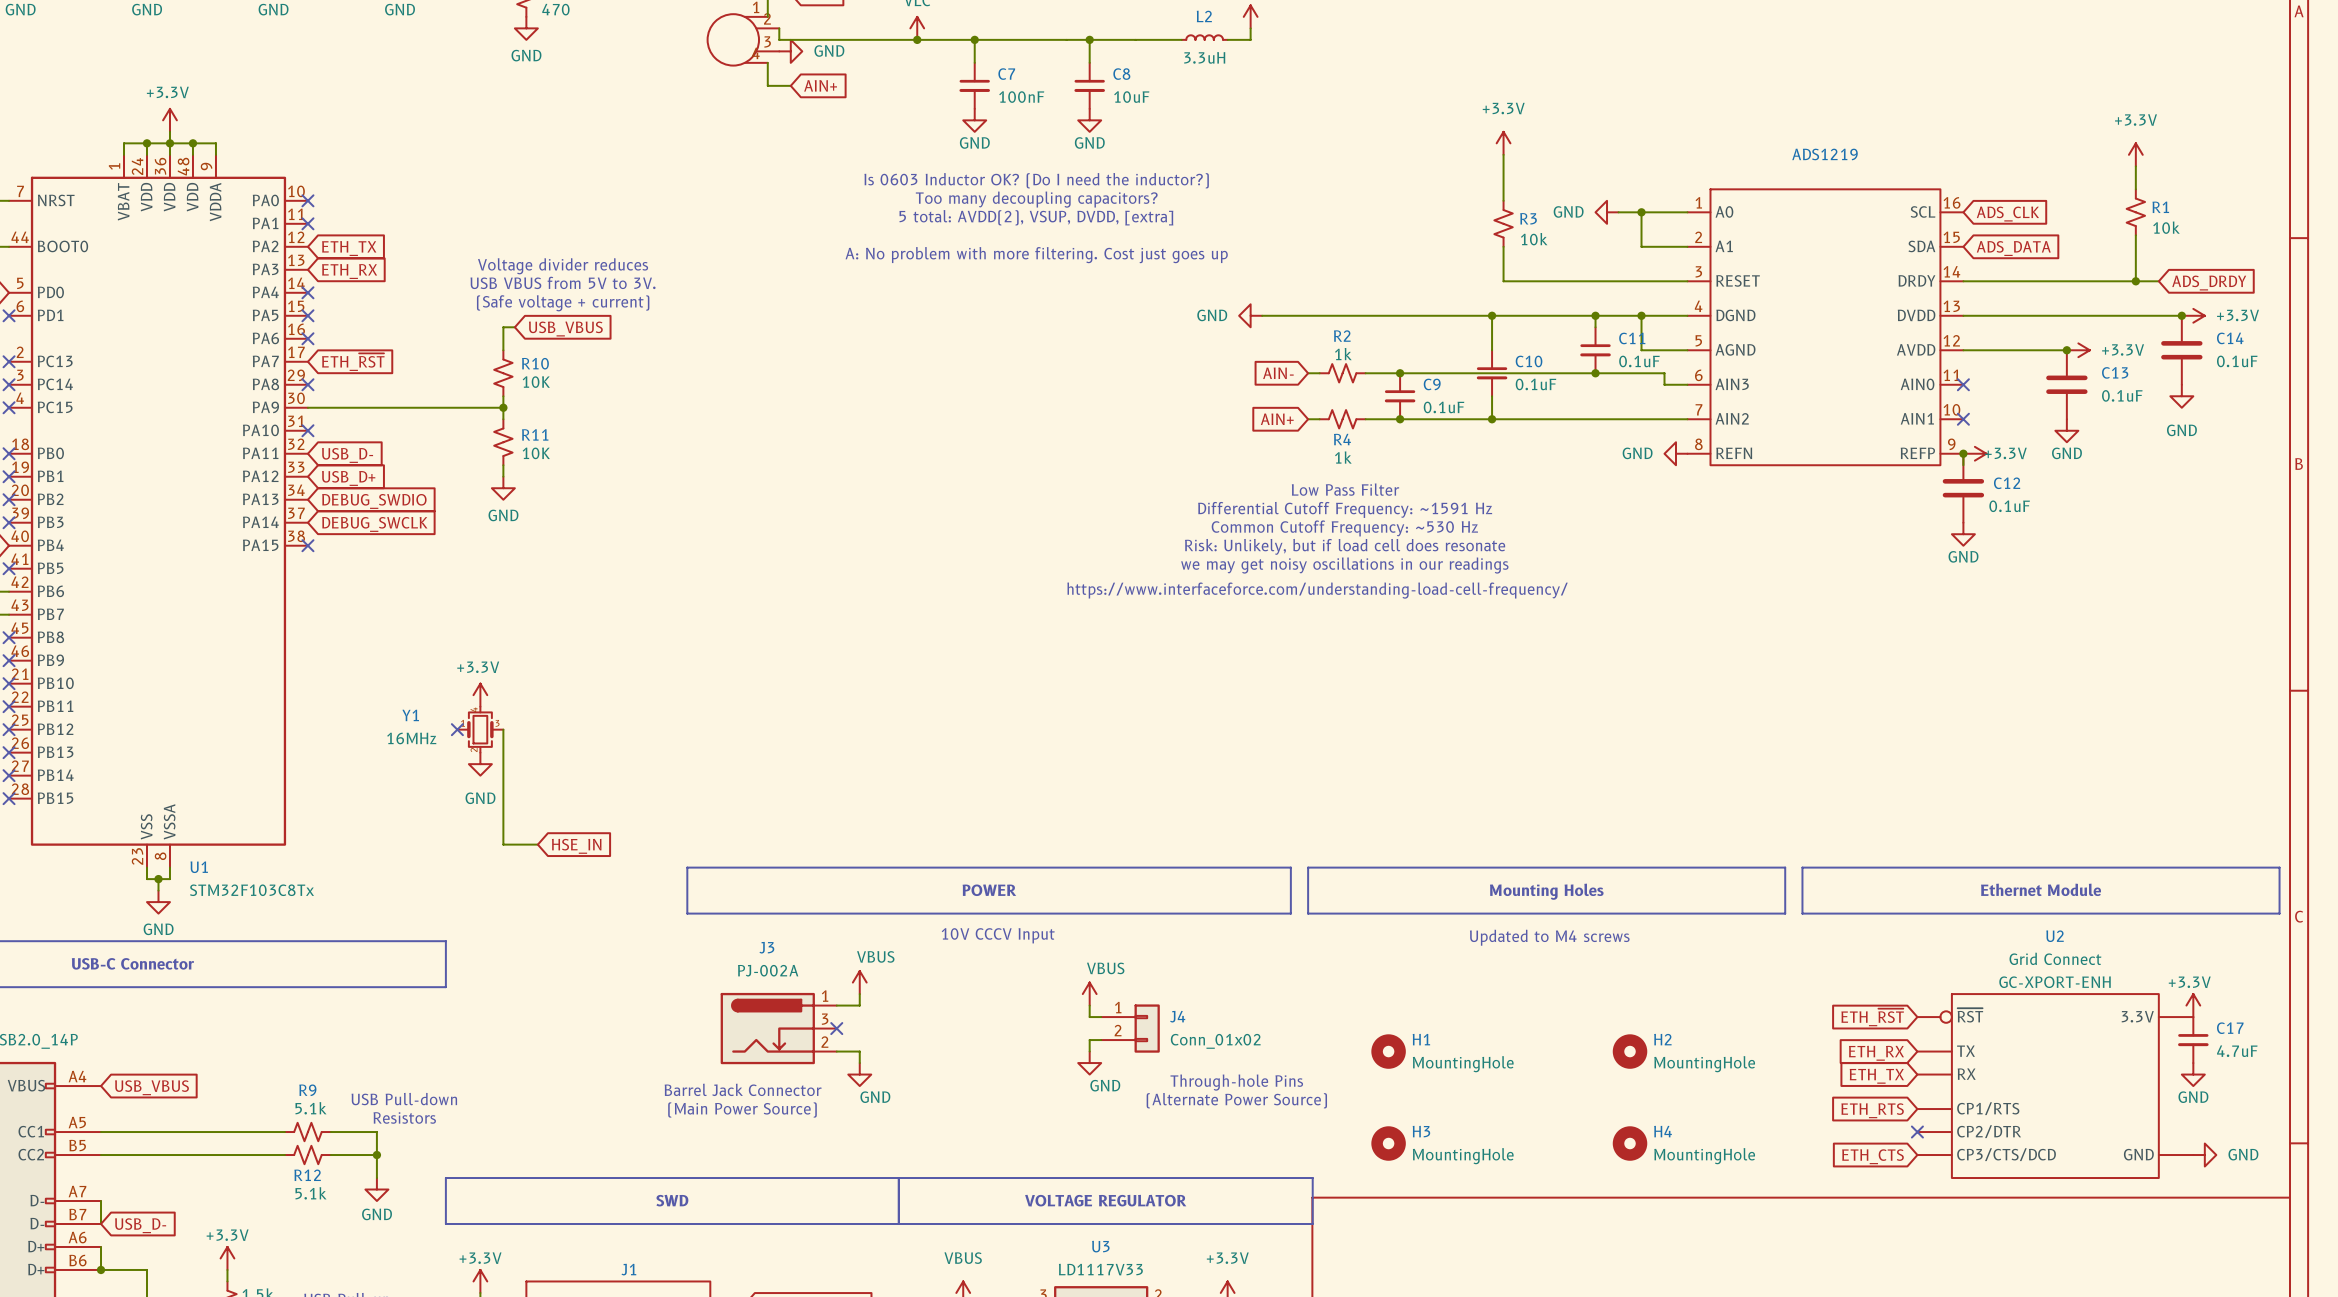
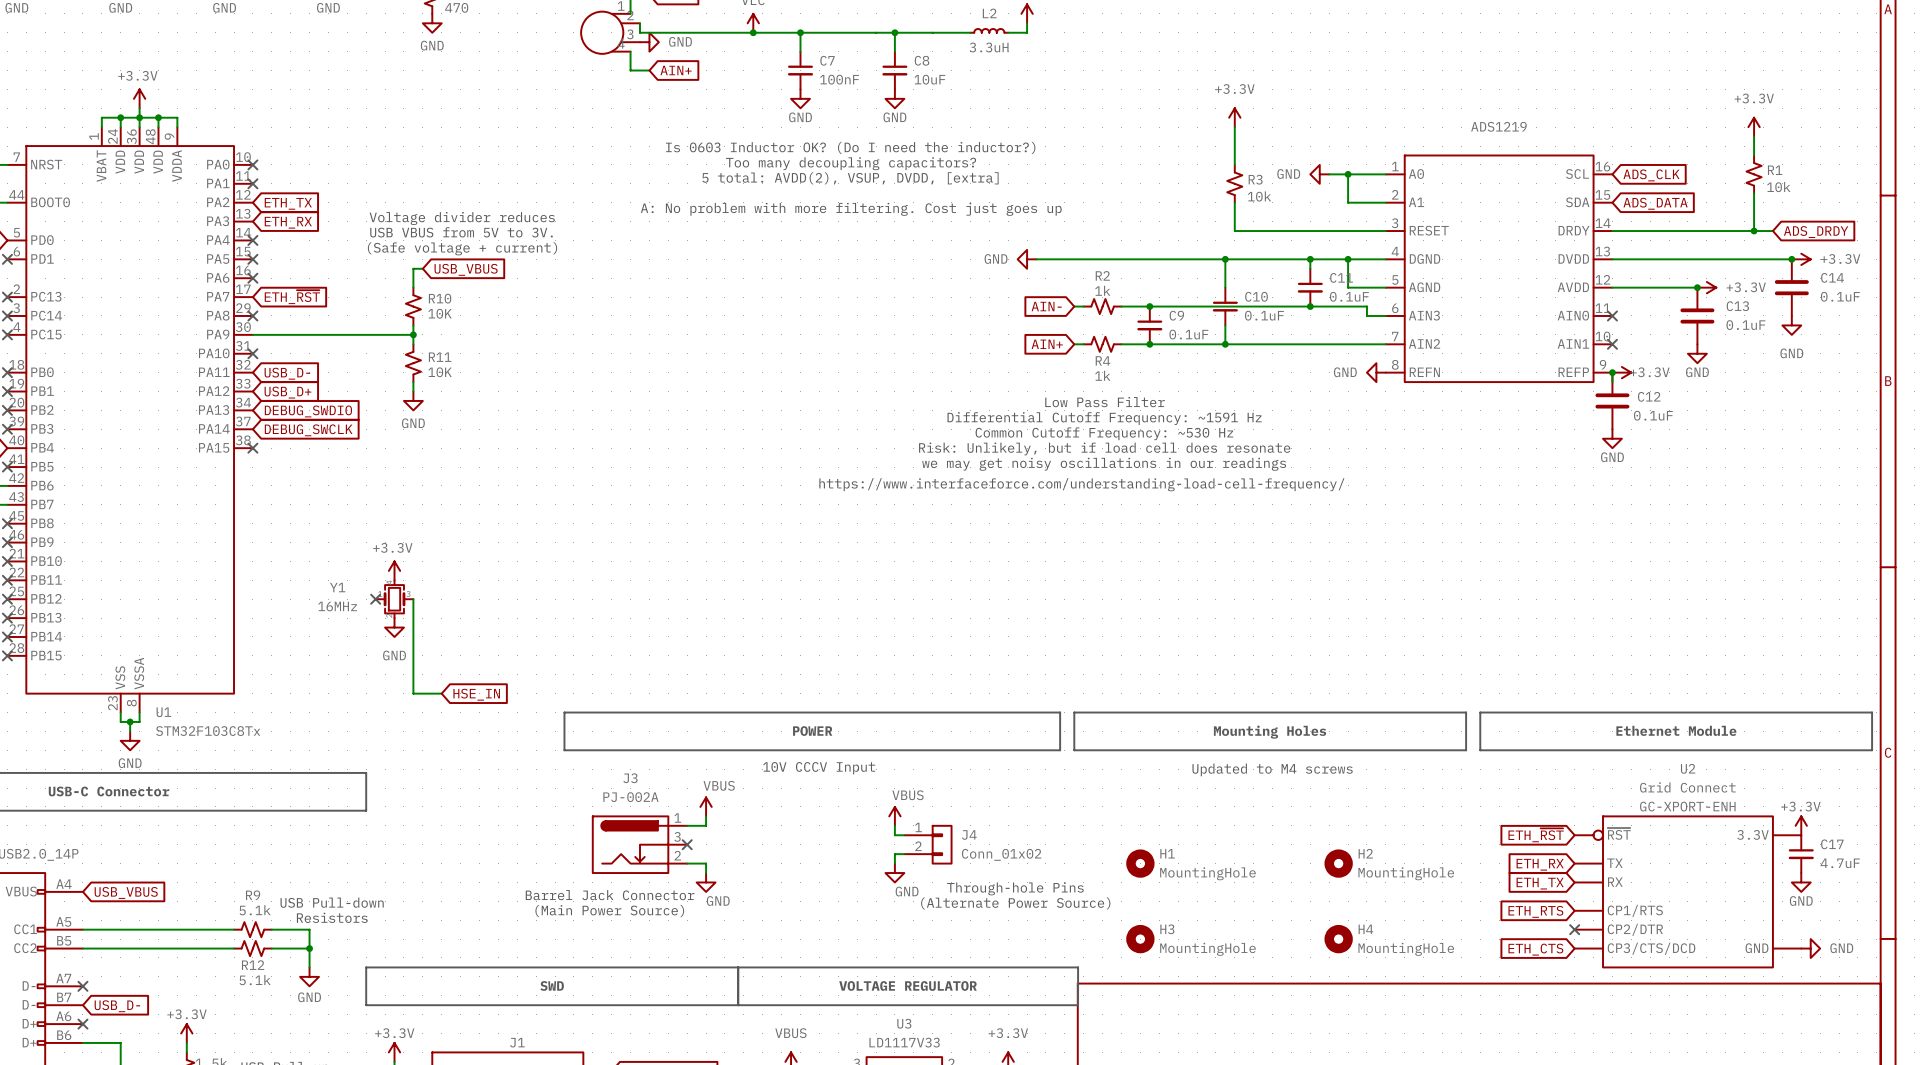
wire: (101, 1201) (101, 1223) -> none
no-connect mark: none -> (82, 986)
wire: (101, 1246) (101, 1269) -> none
no-connect mark: none -> (82, 1024)
junction: (101, 1269) -> none

